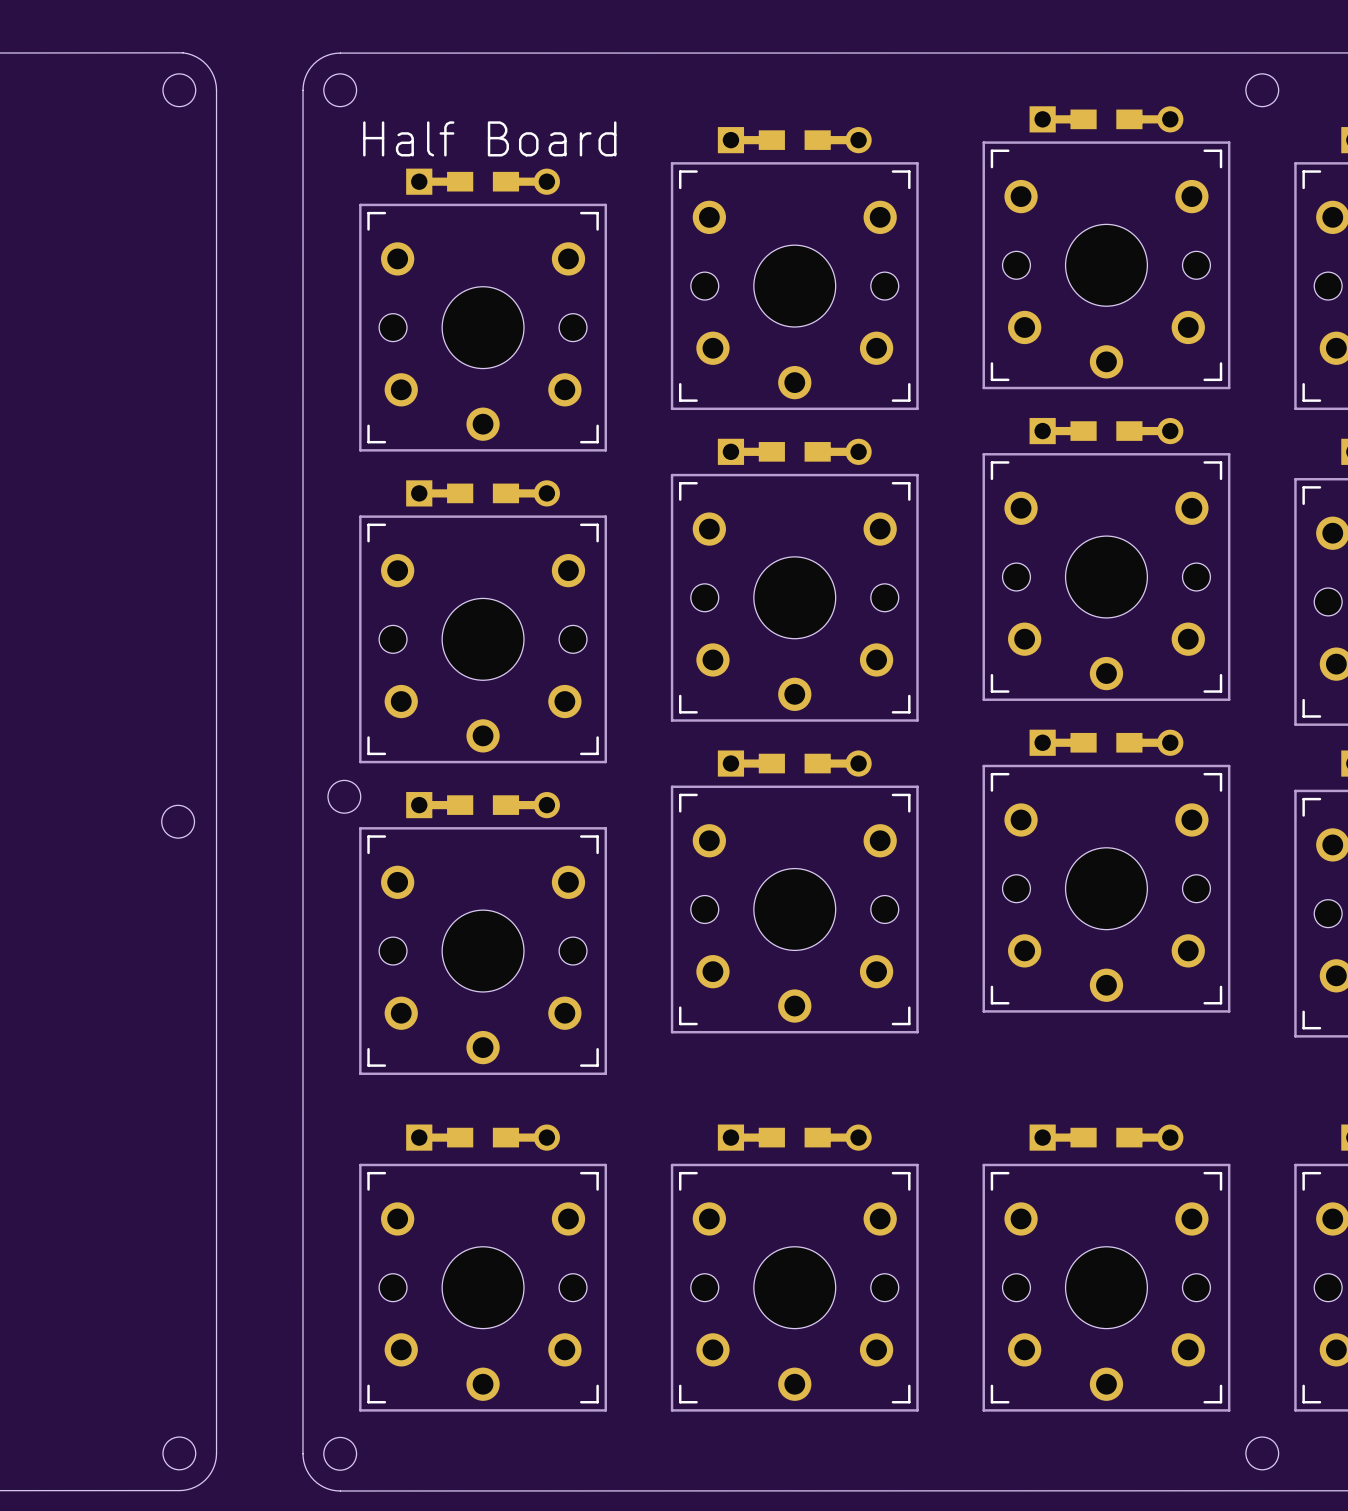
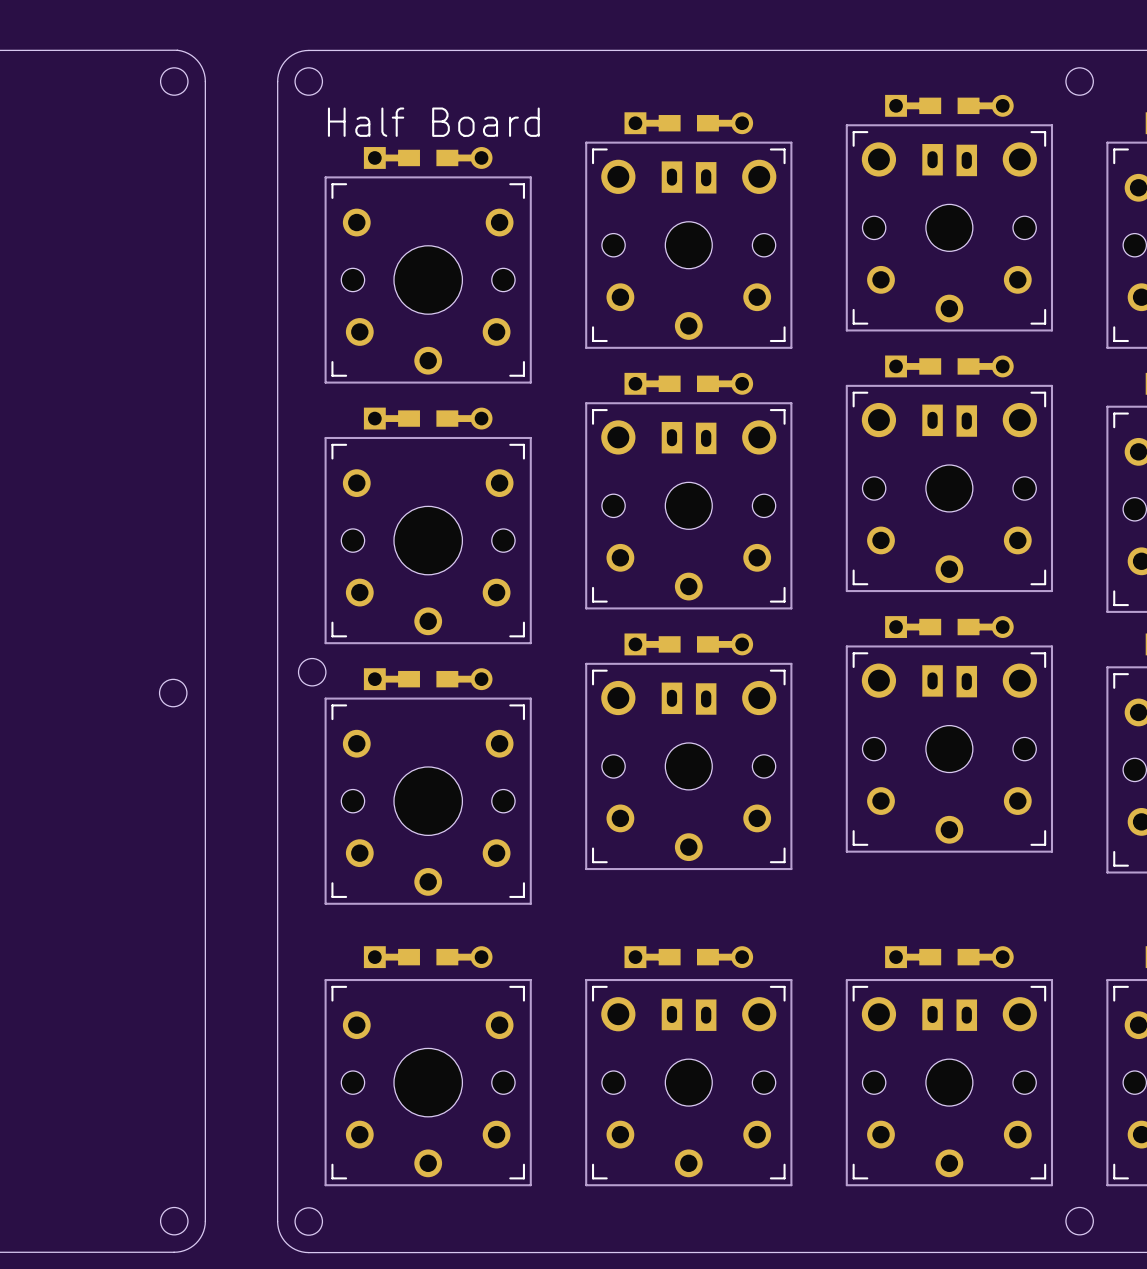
part footprint: [982, 141, 1231, 390] -> [845, 124, 1054, 332]
part footprint: [670, 162, 919, 411] -> [585, 141, 793, 349]
part footprint: [982, 453, 1231, 701] -> [845, 384, 1054, 593]
part footprint: [670, 473, 919, 722] -> [585, 402, 793, 610]
part footprint: [982, 764, 1231, 1013] -> [845, 645, 1054, 853]
part footprint: [670, 785, 919, 1034] -> [585, 662, 793, 871]
part footprint: [670, 1163, 919, 1412] -> [585, 979, 793, 1187]
part footprint: [982, 1163, 1231, 1412] -> [845, 979, 1054, 1187]

